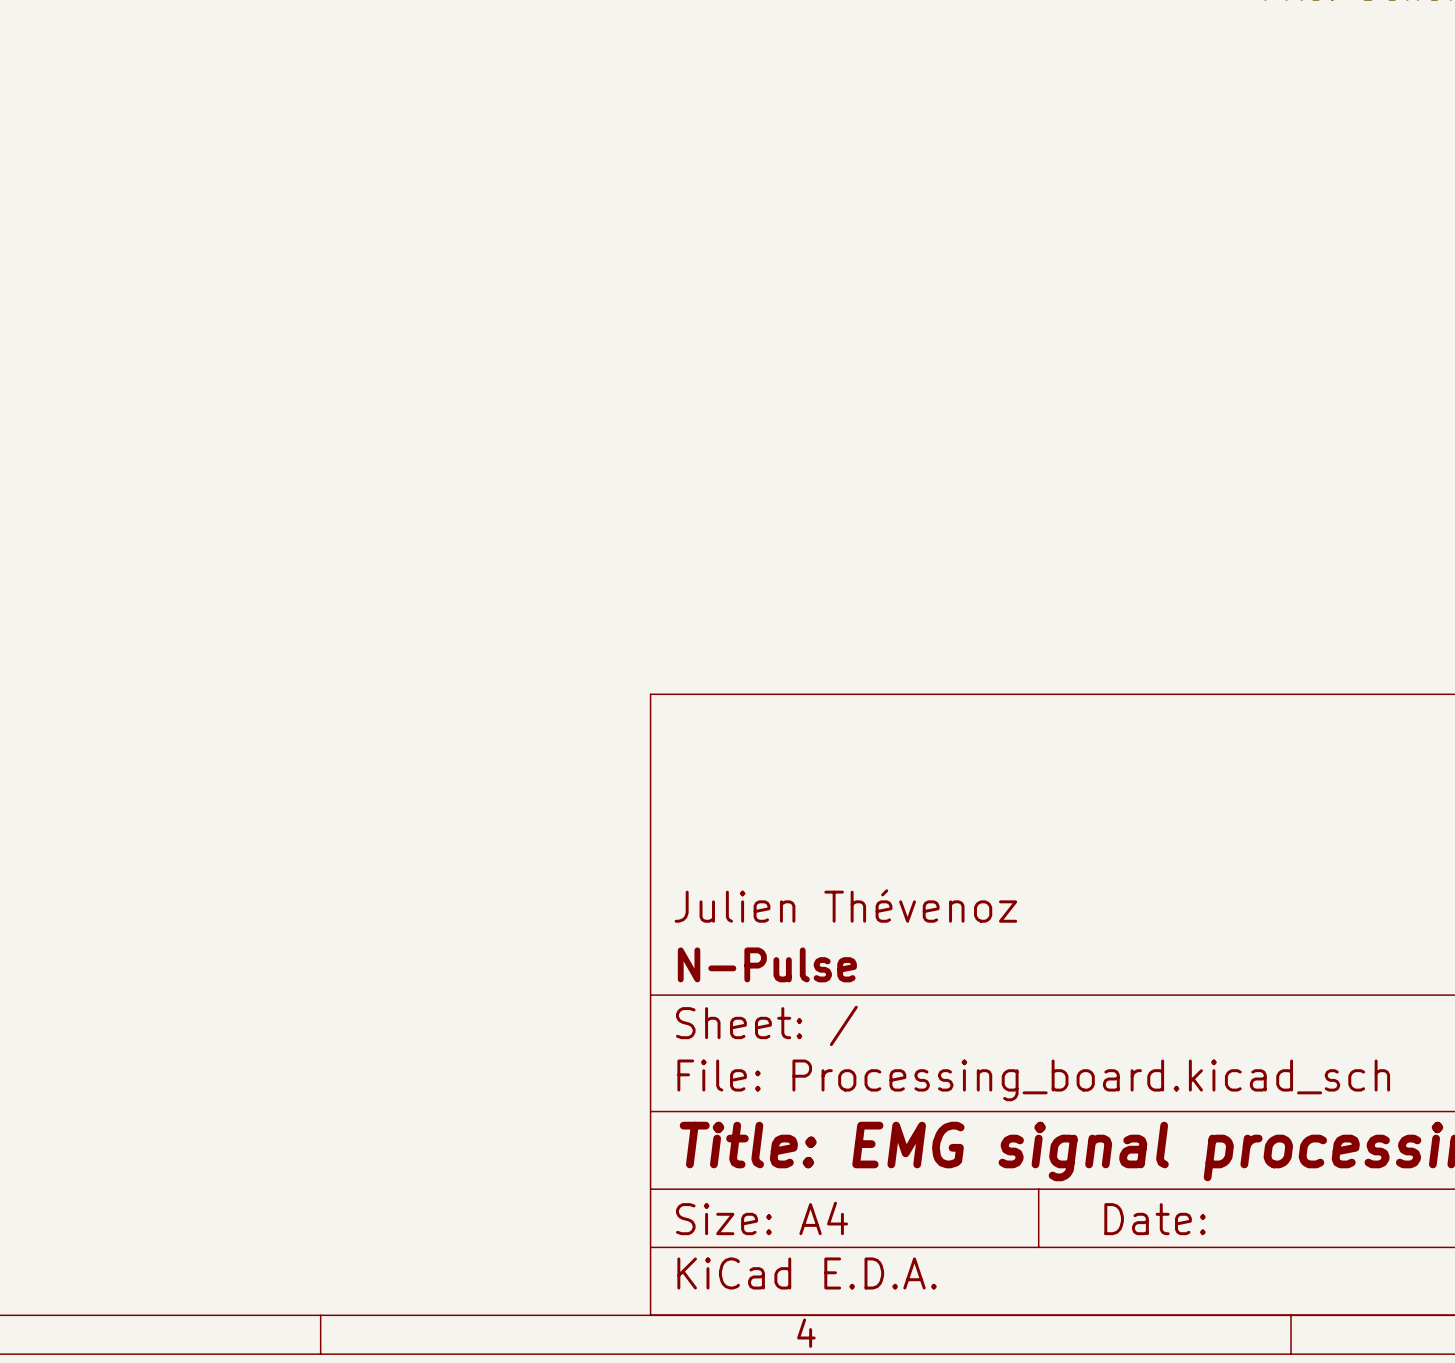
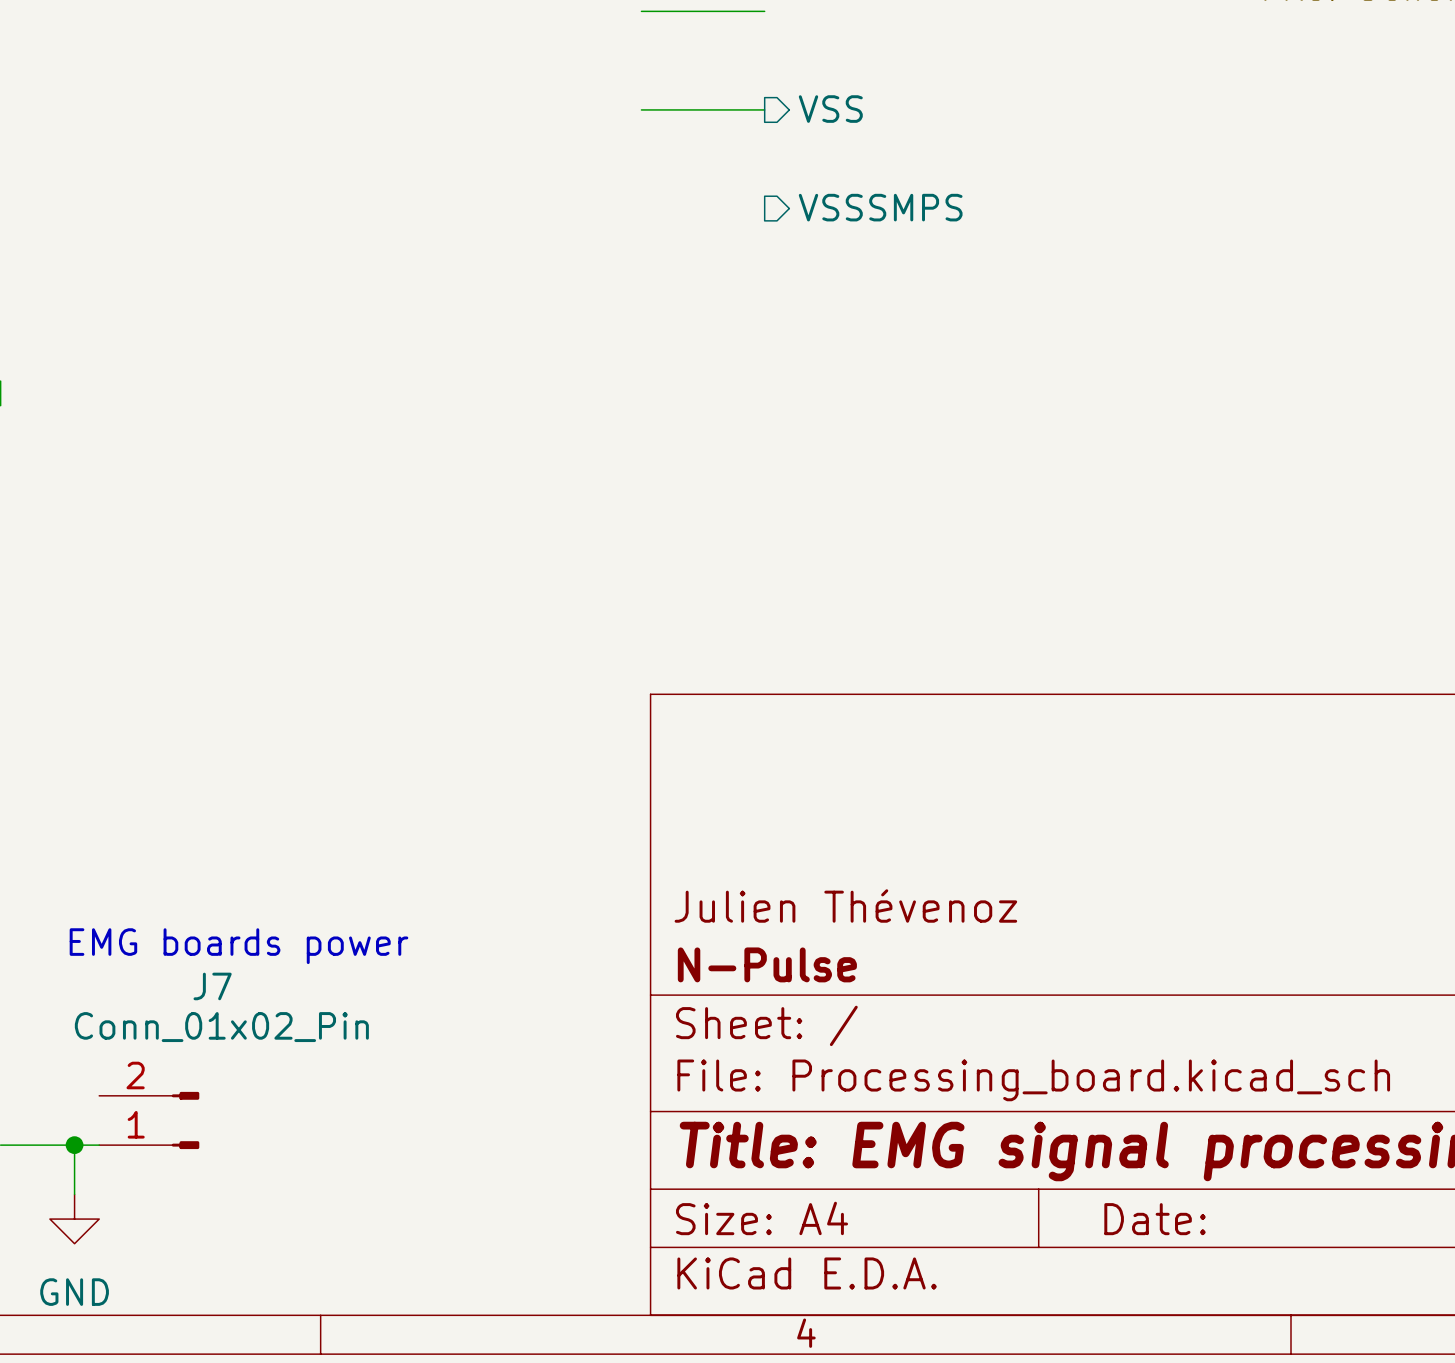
wire: none -> (641, 11) (764, 11)
wire: none -> (641, 109) (764, 109)
sheet pin: none -> VSS (830, 109)
sheet pin: none -> VSSSMPS (880, 207)
wire: none -> (0, 381) (0, 405)
text: none -> EMG boards power (239, 946)
J7: none -> Conn_01x02_Pin (149, 1120)
wire: none -> (0, 1145) (99, 1145)
wire: none -> (74, 1145) (74, 1194)
junction: none -> (74, 1145)
power symbol: none -> GND (74, 1219)

